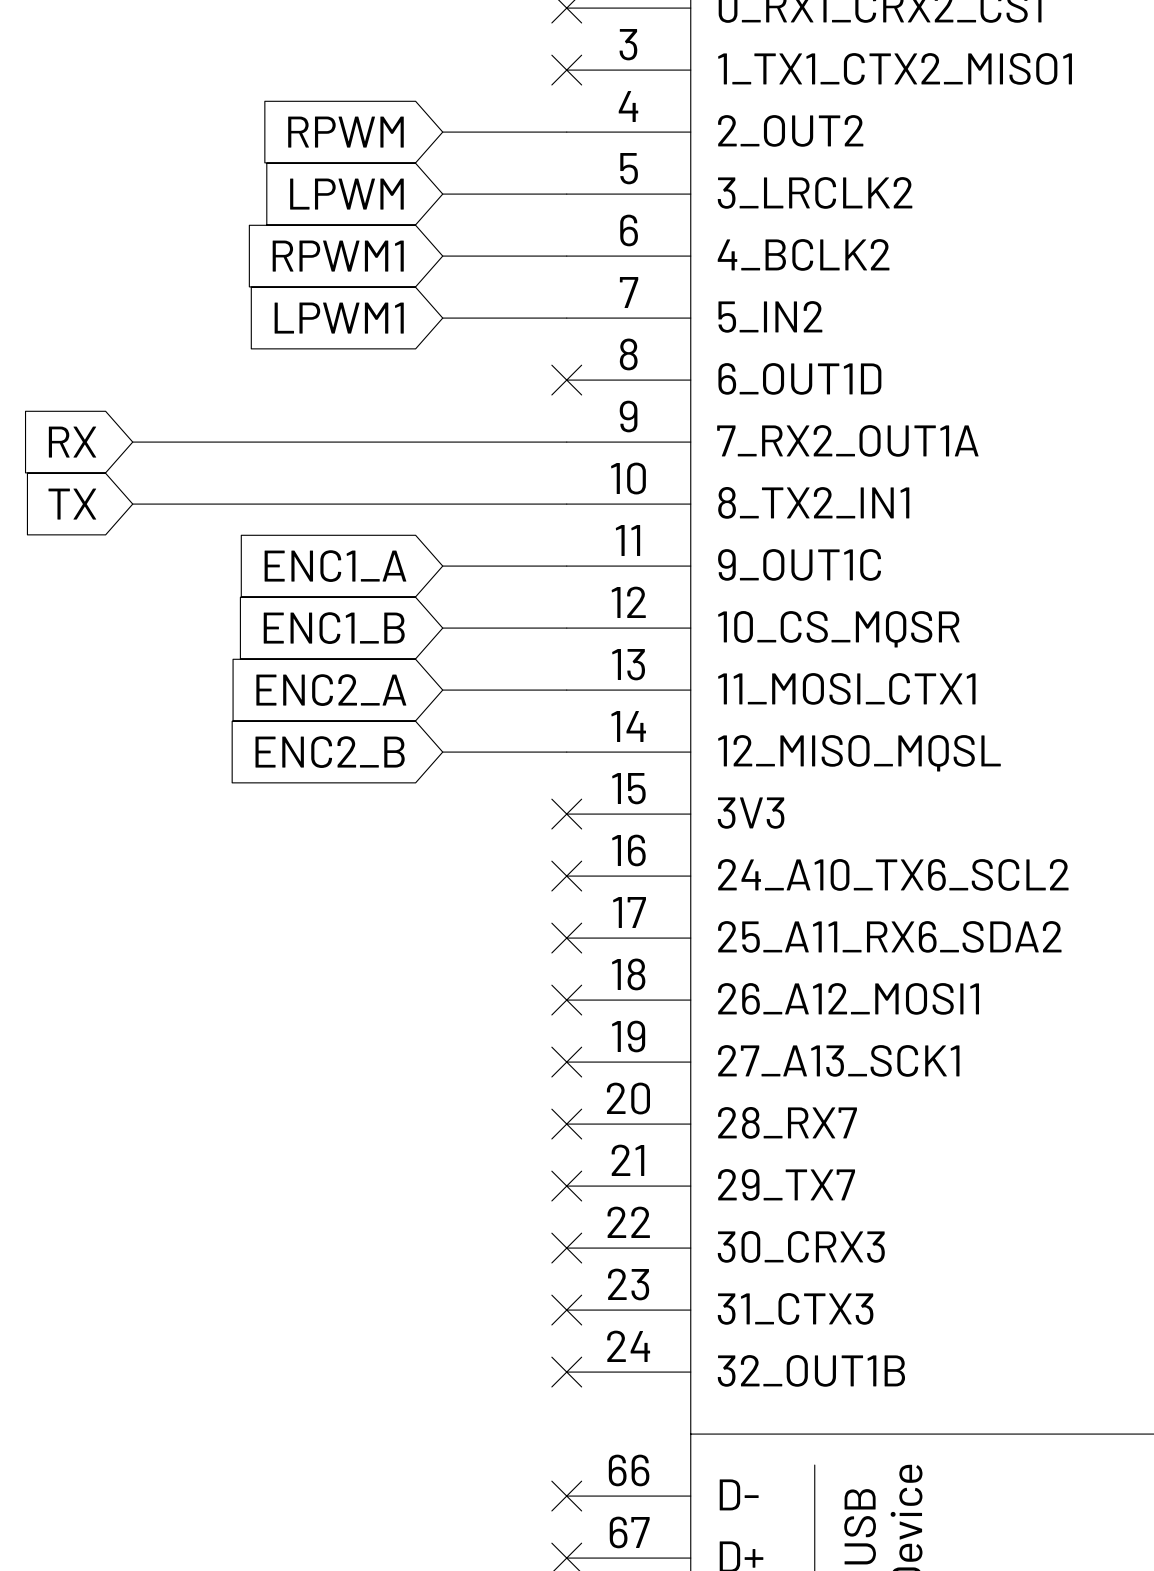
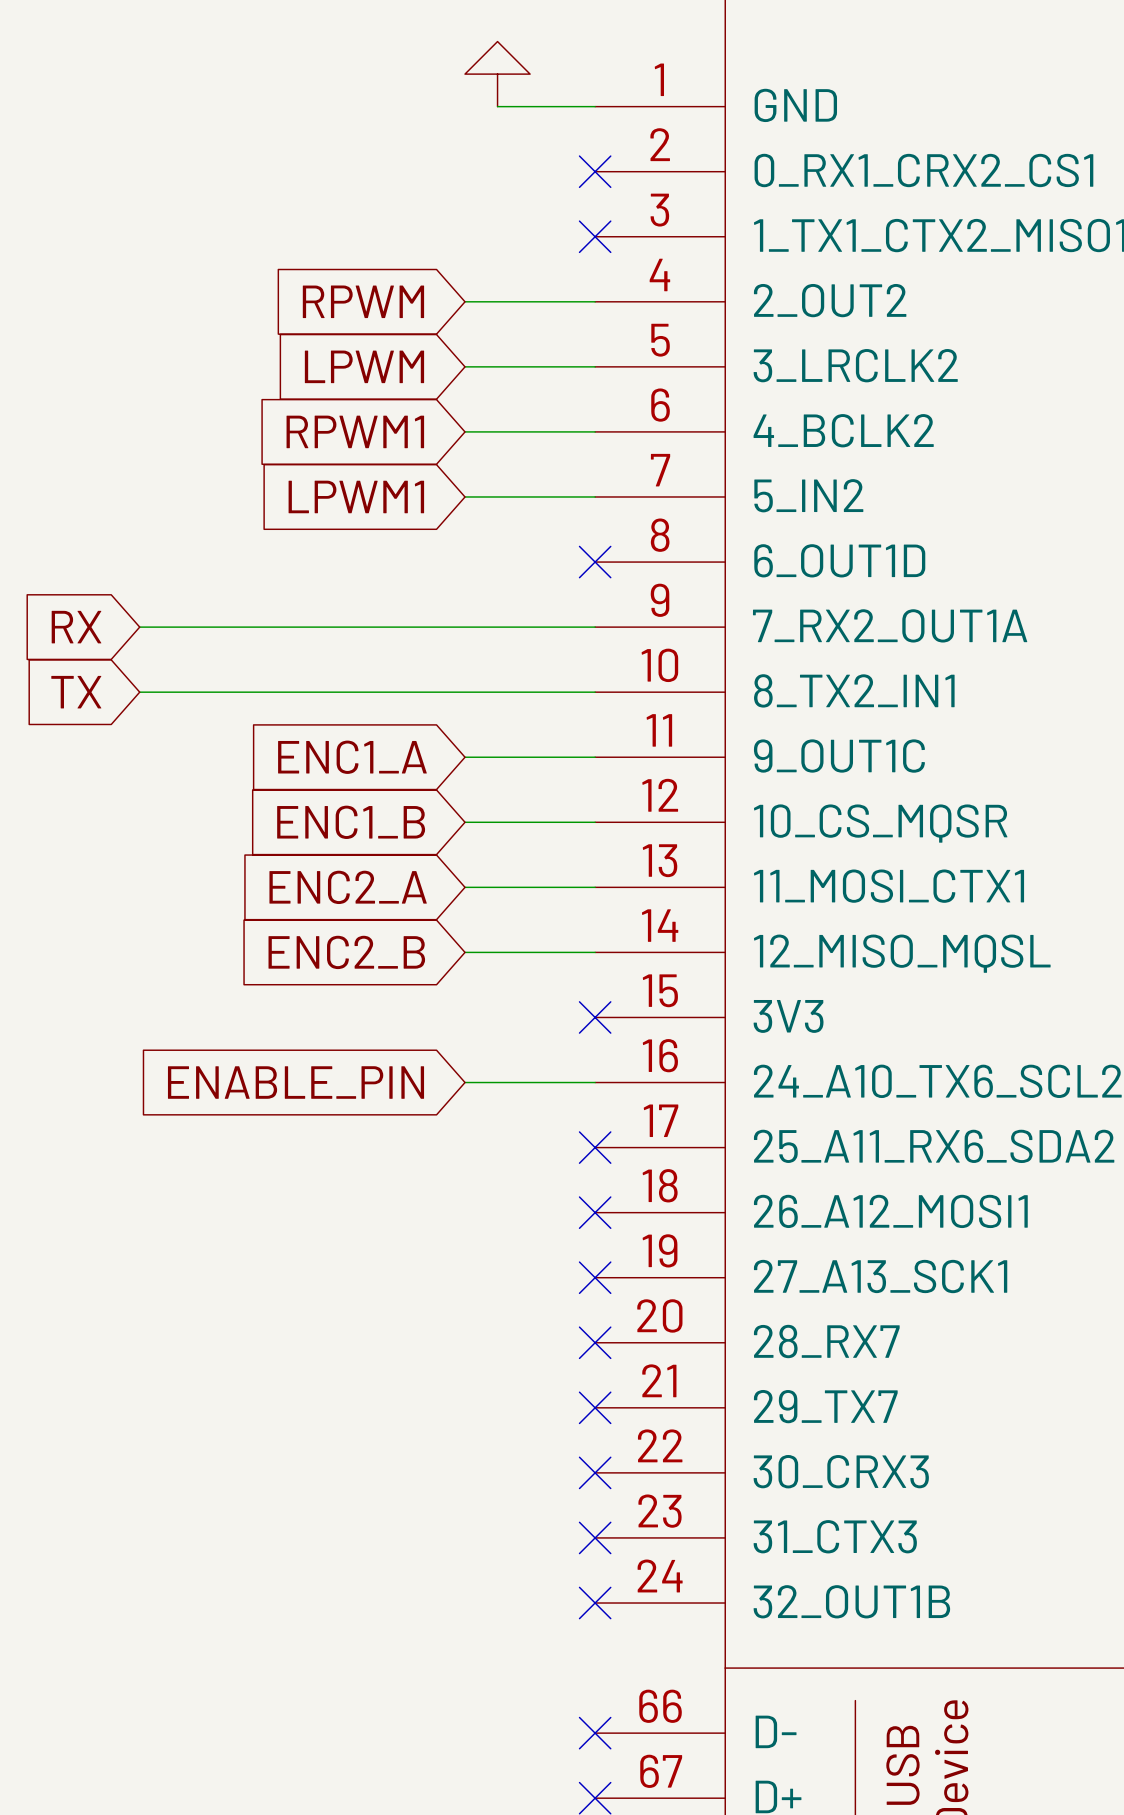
global label: none -> ENABLE_PIN (296, 1082)
wire: none -> (465, 1082) (595, 1082)
no-connect mark: (566, 876) -> none

